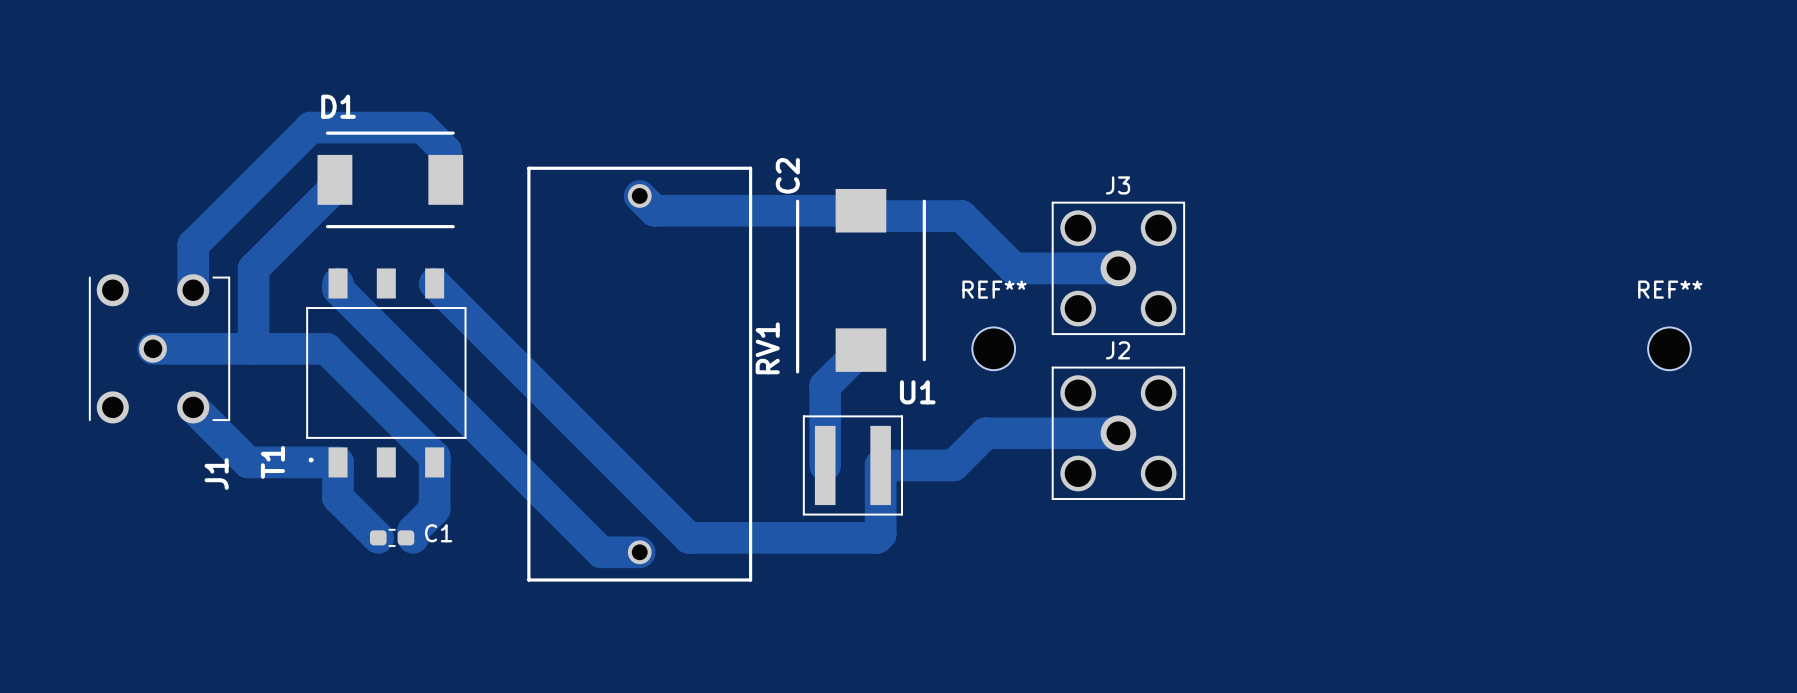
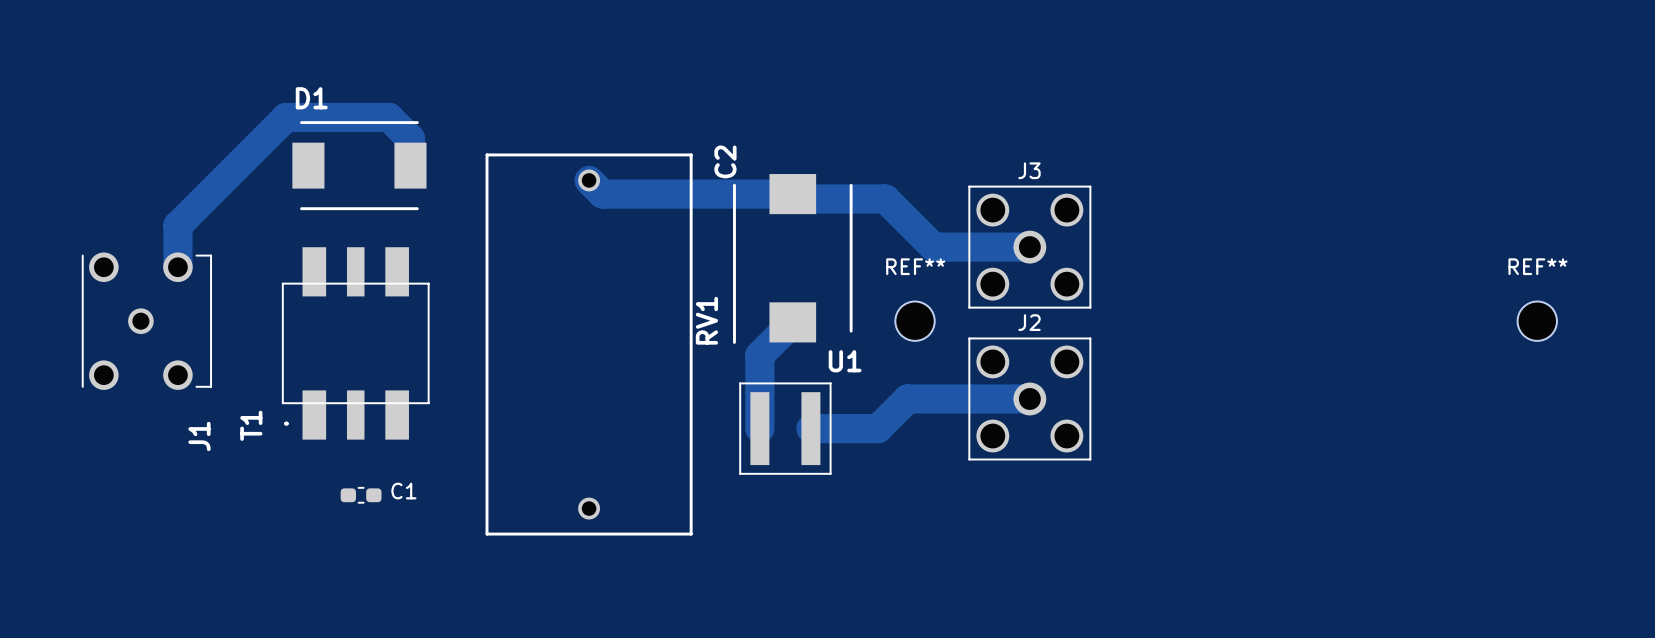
track: (334, 179) (334, 187) (253, 268) (253, 348) -> none
T1 footprint: [306, 268, 467, 478] -> [282, 247, 430, 440]
track: (338, 283) (338, 289) (601, 552) (639, 552) -> none
track: (434, 283) (689, 537) (877, 537) (880, 534) (880, 465) -> none
track: (153, 348) (326, 348) (434, 456) (434, 509) (413, 530) (413, 537) -> none
track: (193, 407) (248, 462) (338, 462) (338, 497) (378, 537) -> none

